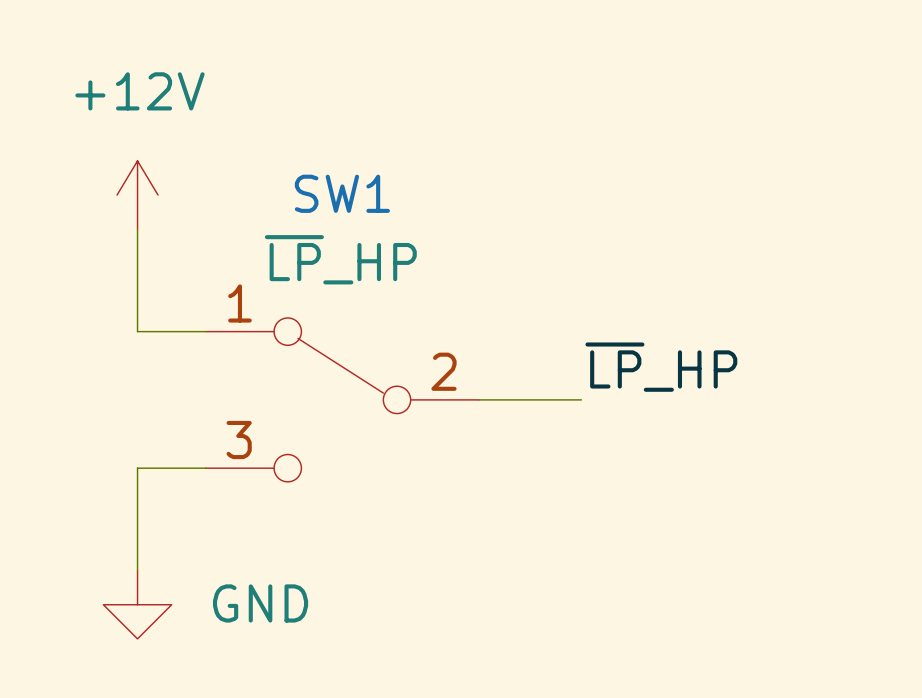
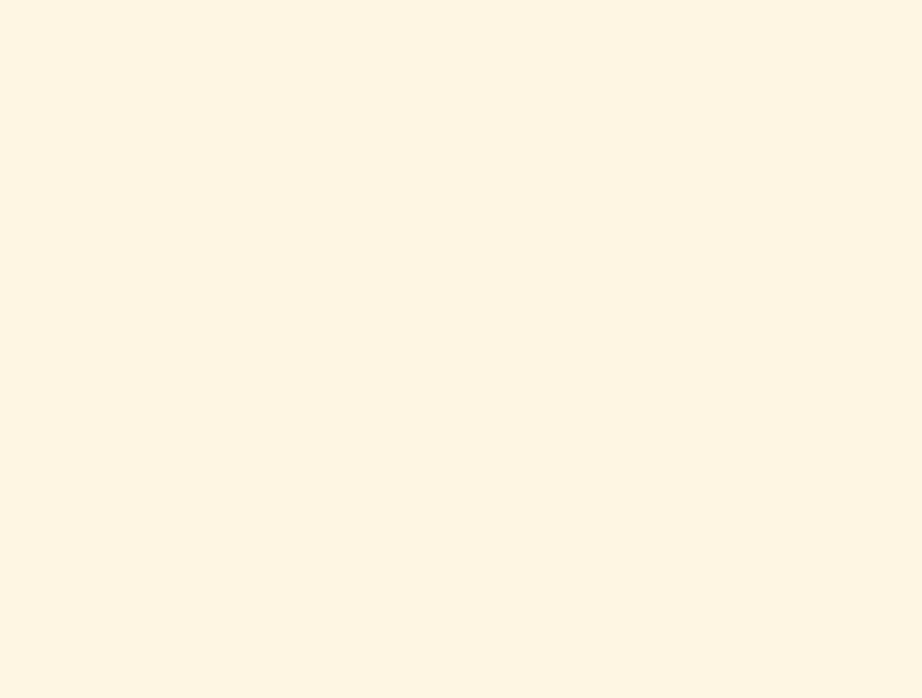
power symbol: +12V (137, 195) -> none
wire: (137, 229) (137, 331) (205, 331) -> none
label: ~{LP}_HP (661, 367) -> none
SW1: ~{LP}_HP (342, 399) -> none
wire: (478, 399) (581, 399) -> none
wire: (205, 468) (137, 468) (137, 570) -> none
power symbol: GND (137, 604) -> none

